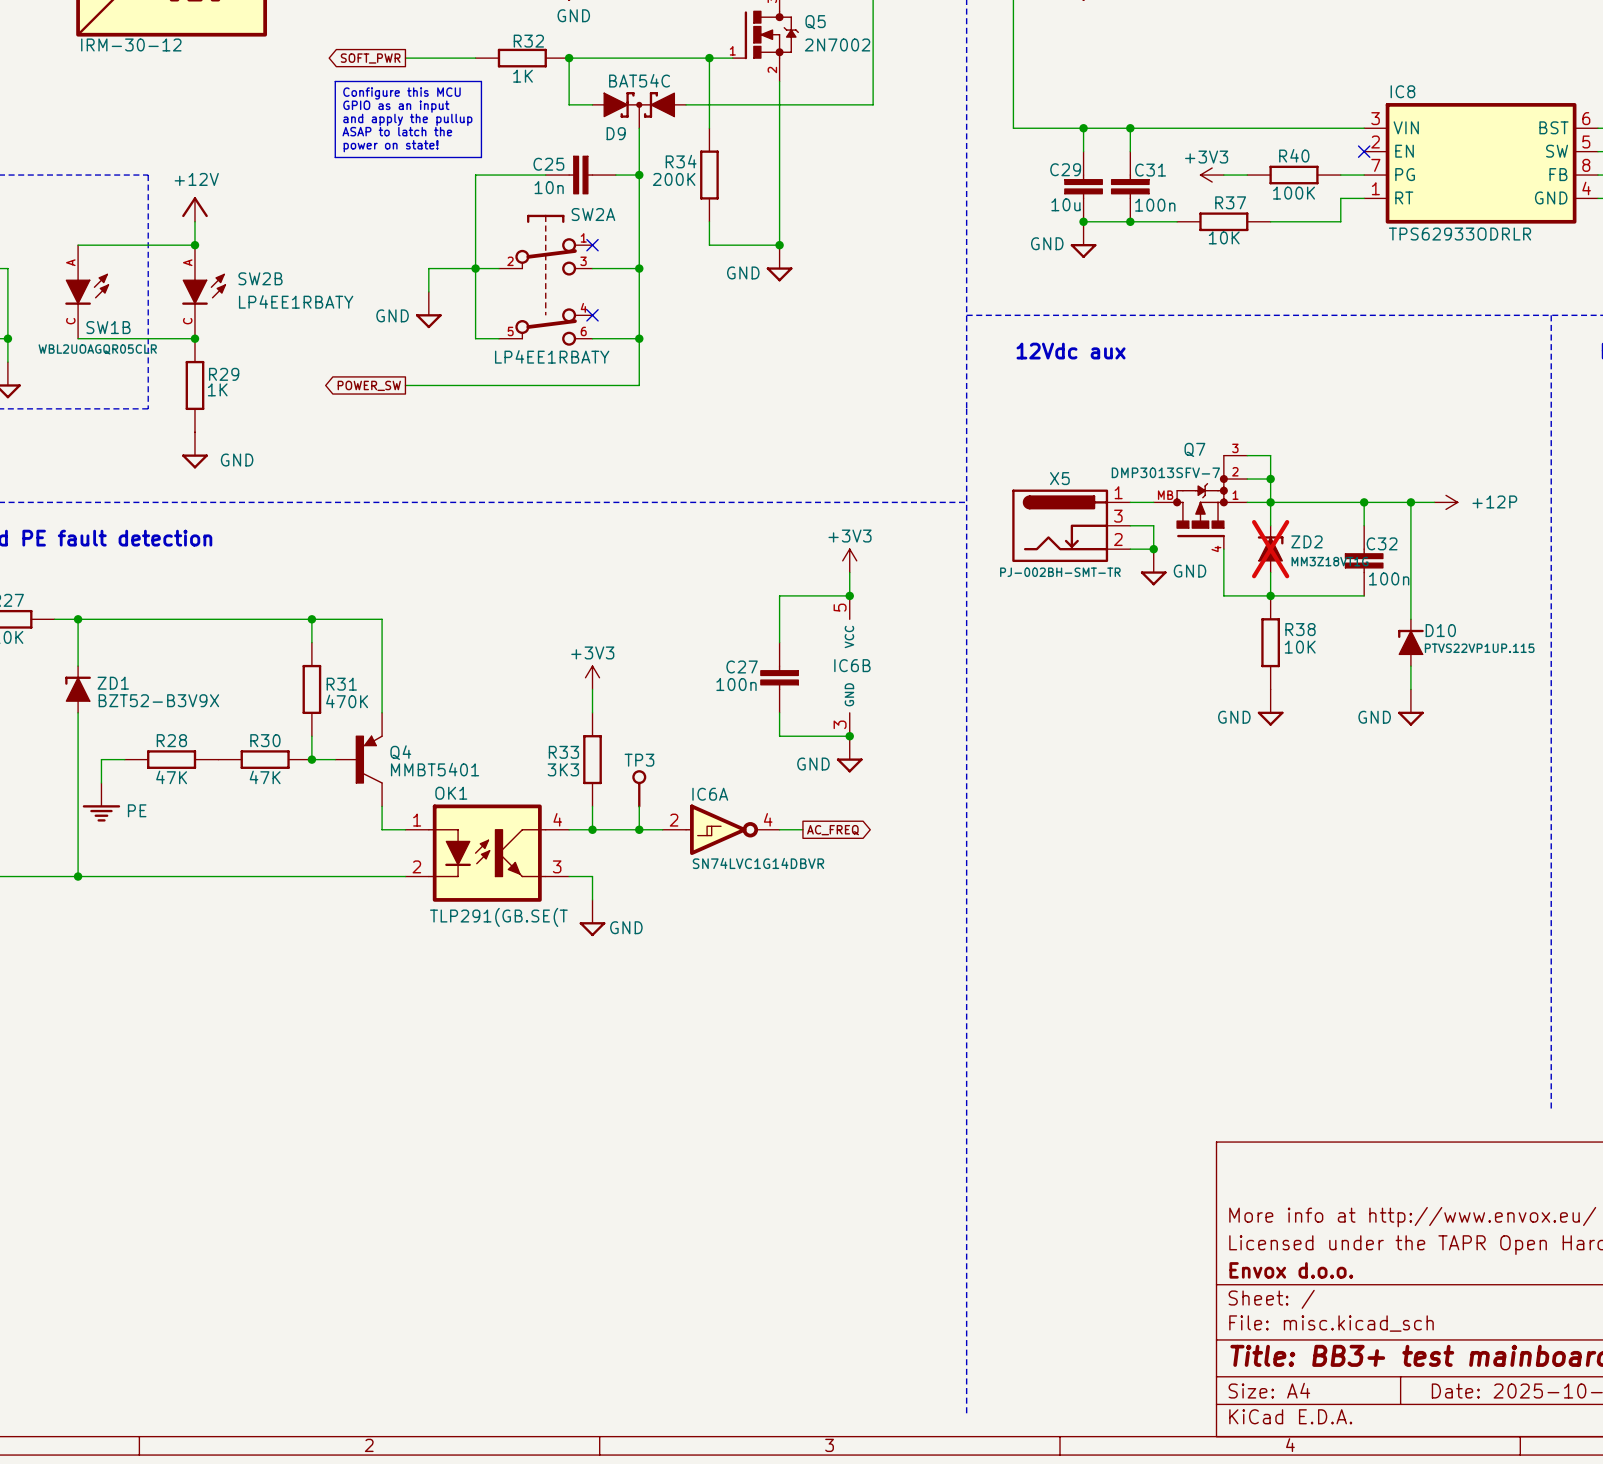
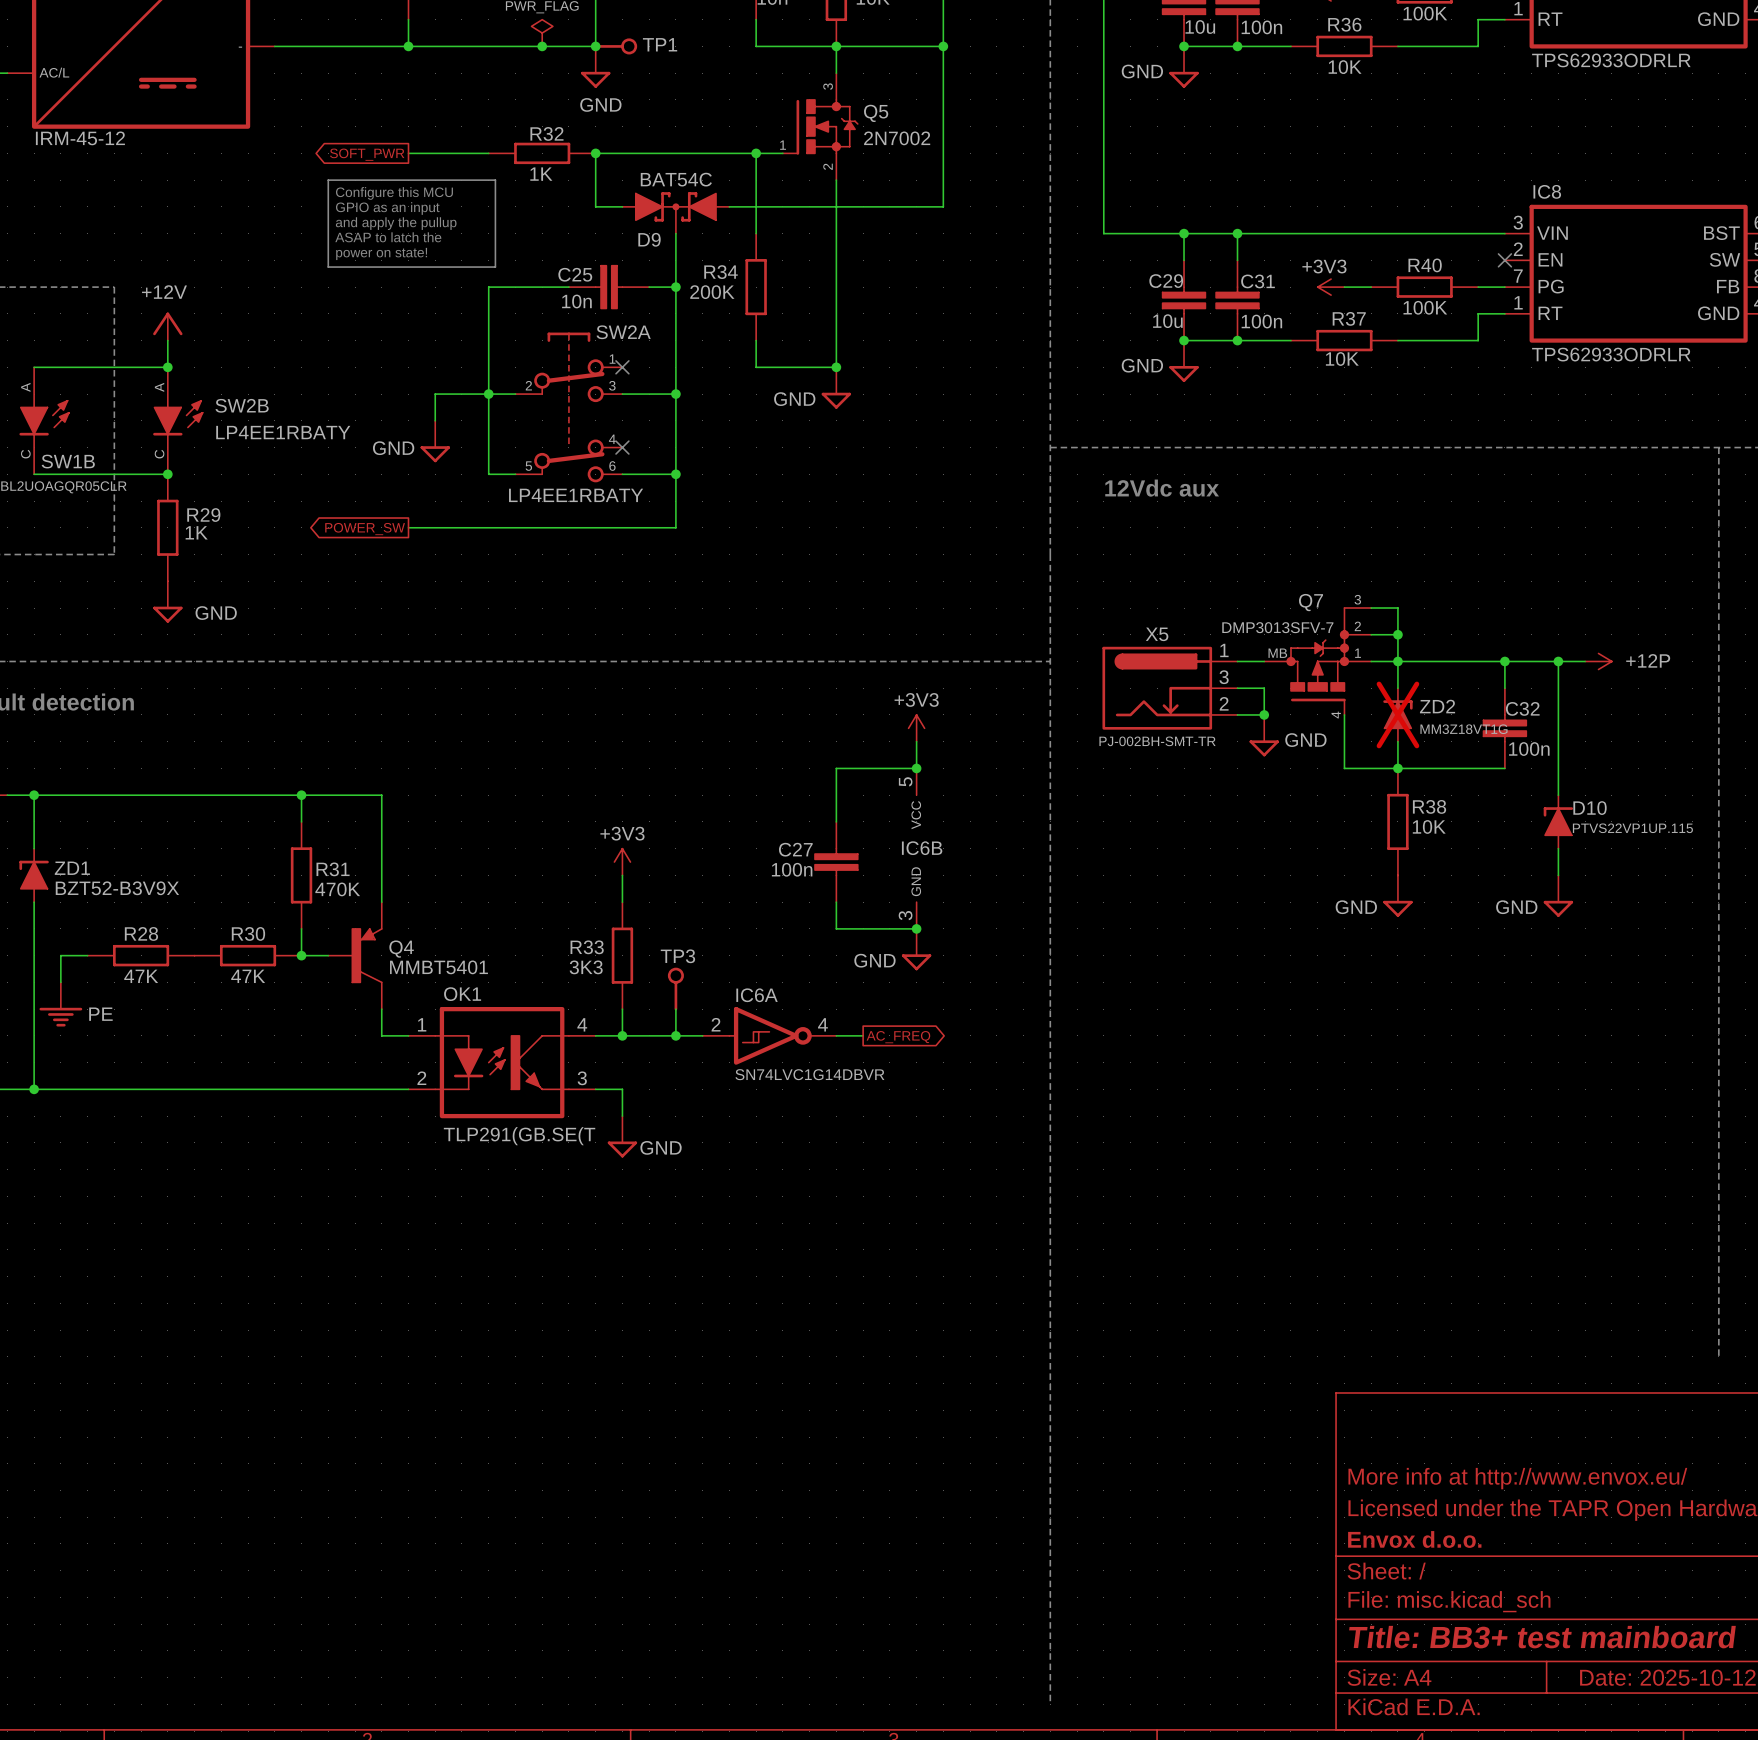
part value: IRM-30-12 (131, 44) -> IRM-45-12 (80, 138)

